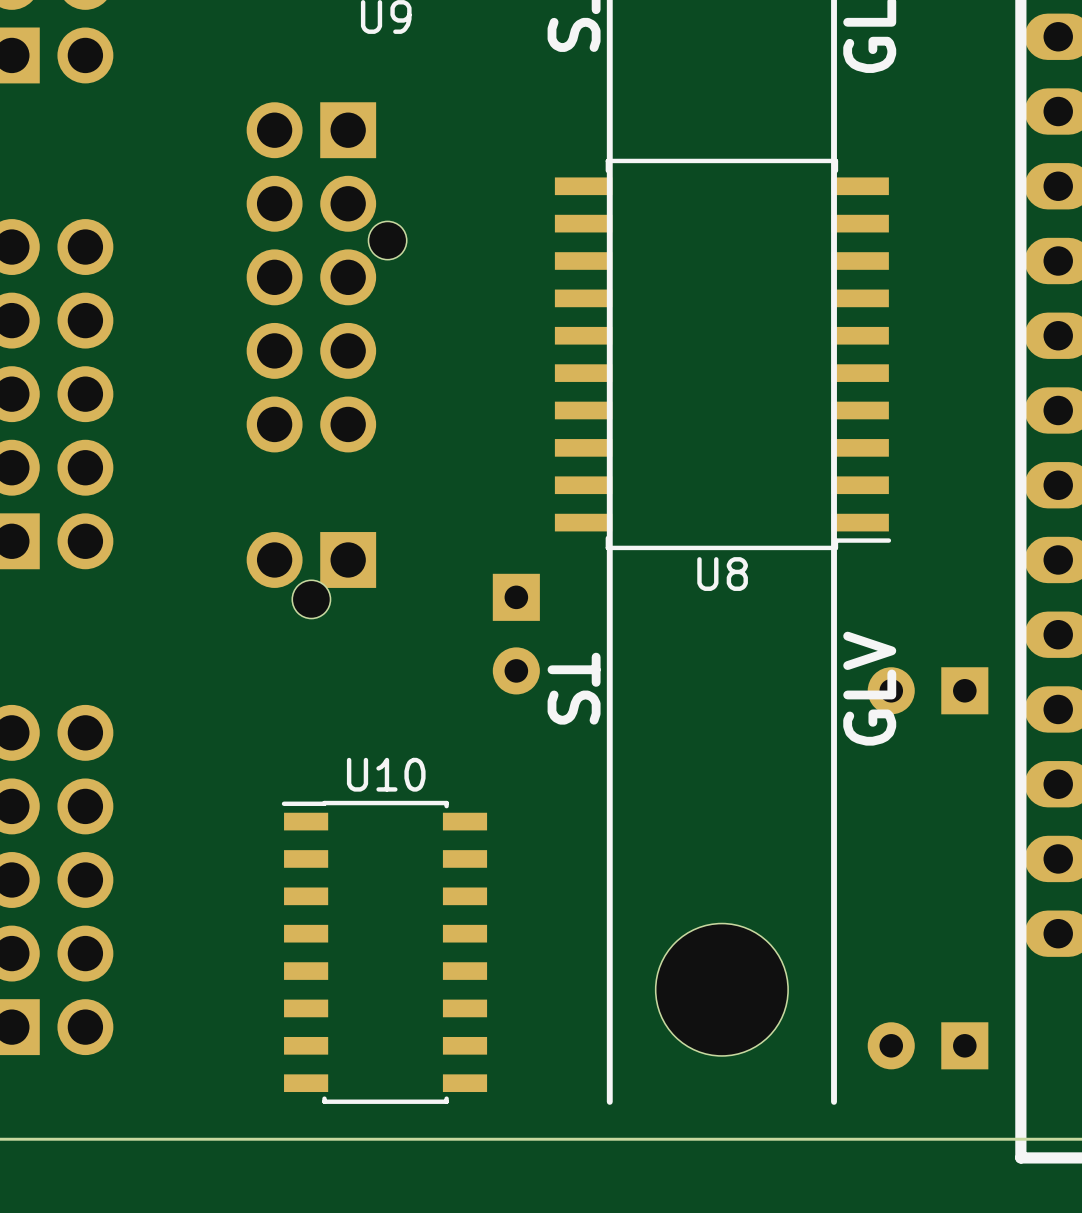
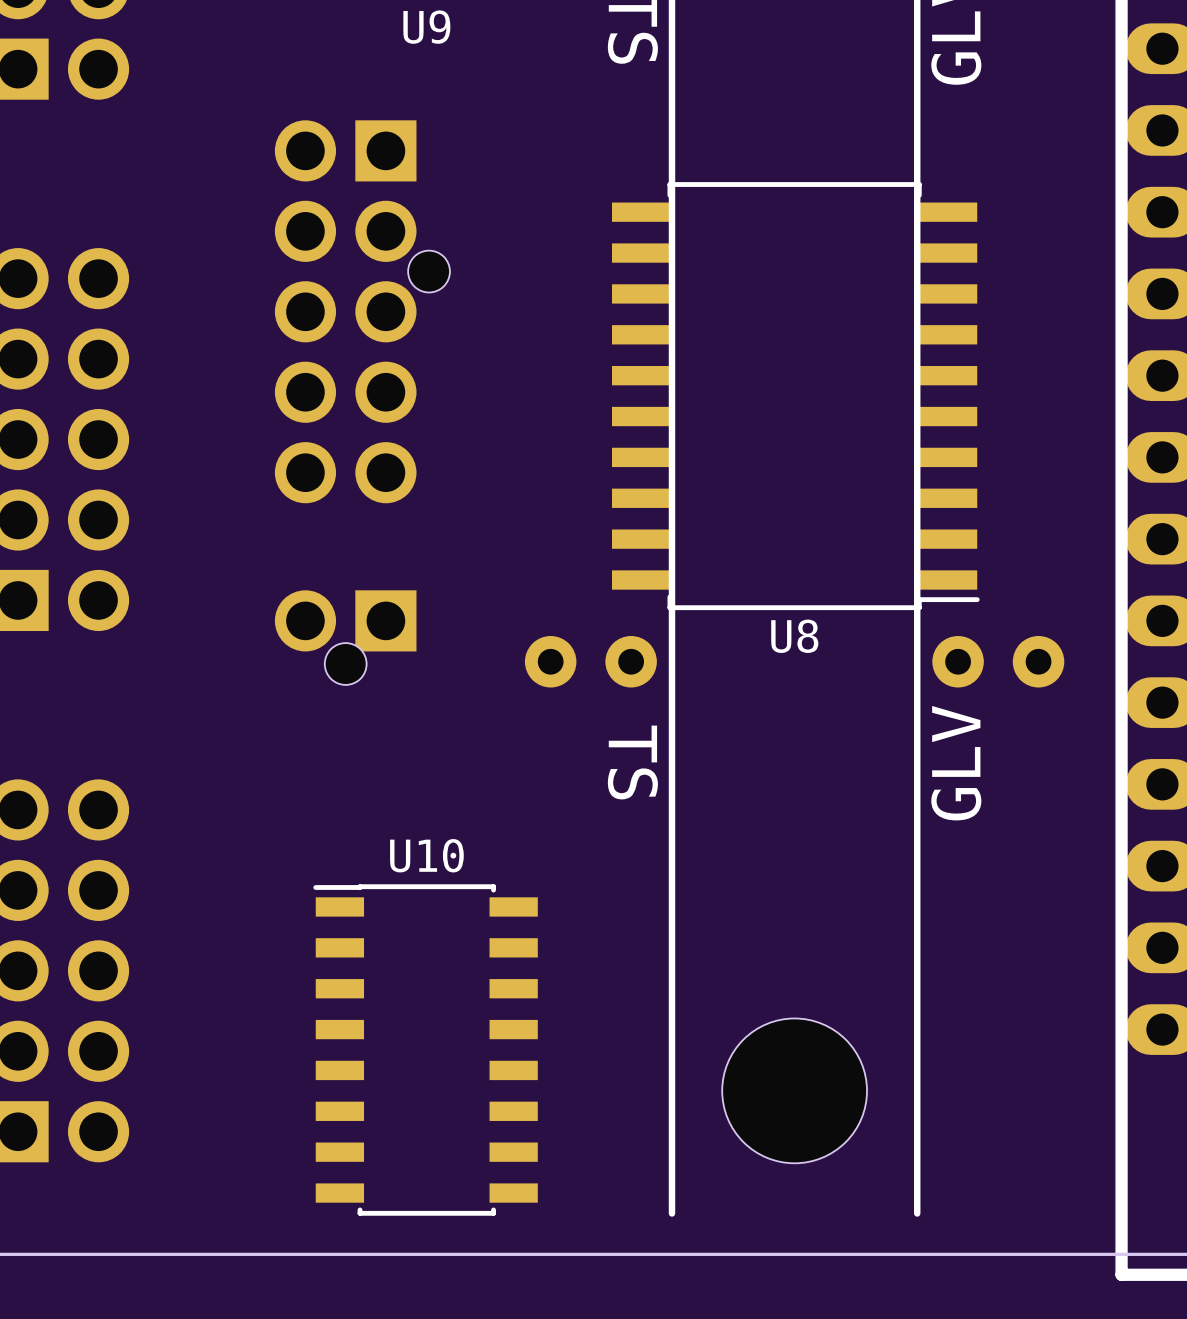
part: none -> (590, 661)
part: none -> (998, 661)
part: (516, 634) -> none
part: (928, 690) -> none
part: (928, 1045) -> none

